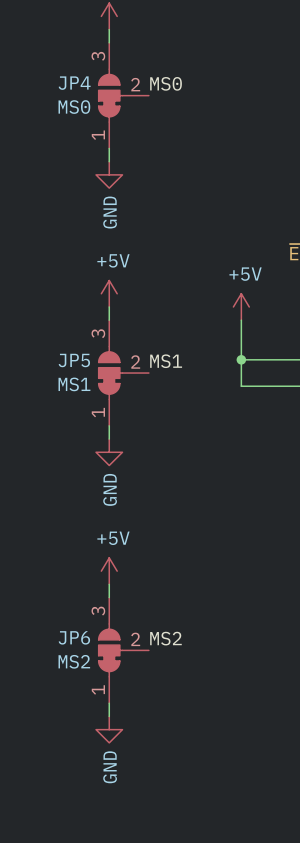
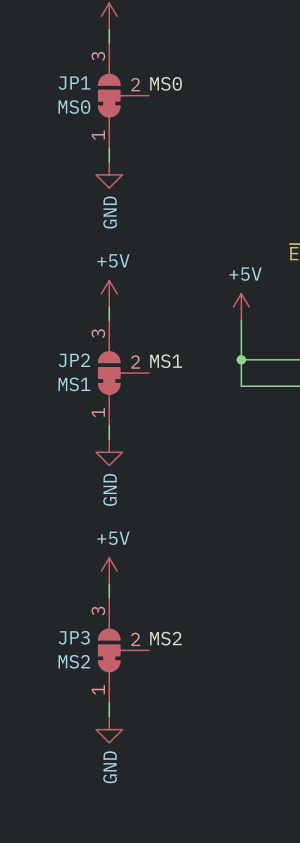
JP4 name: JP4 (74, 83) -> JP1 (74, 83)
JP5 name: JP5 (74, 360) -> JP2 (74, 360)
JP6 name: JP6 (74, 637) -> JP3 (74, 637)

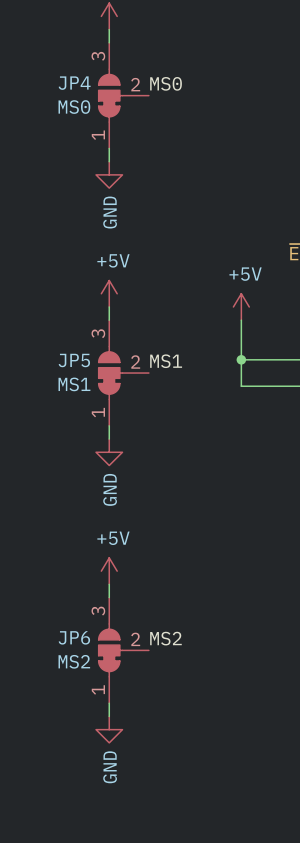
JP1 name: JP1 (74, 83) -> JP4 (74, 83)
JP2 name: JP2 (74, 360) -> JP5 (74, 360)
JP3 name: JP3 (74, 637) -> JP6 (74, 637)

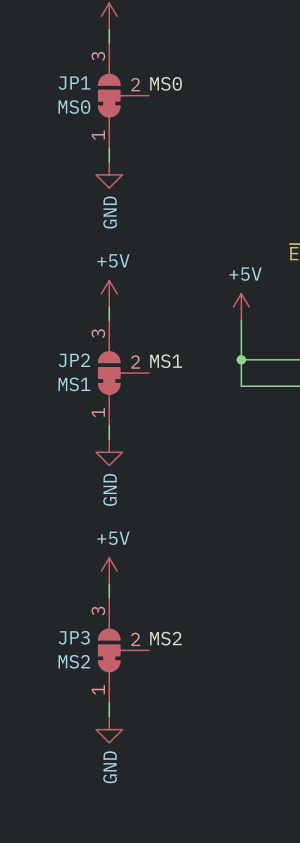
JP4 name: JP4 (74, 83) -> JP1 (74, 83)
JP5 name: JP5 (74, 360) -> JP2 (74, 360)
JP6 name: JP6 (74, 637) -> JP3 (74, 637)

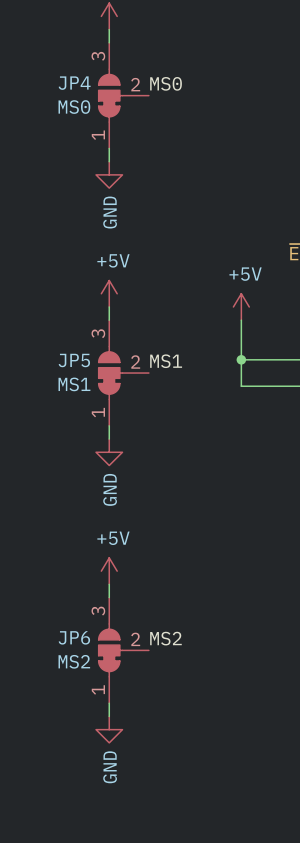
JP1 name: JP1 (74, 83) -> JP4 (74, 83)
JP2 name: JP2 (74, 360) -> JP5 (74, 360)
JP3 name: JP3 (74, 637) -> JP6 (74, 637)

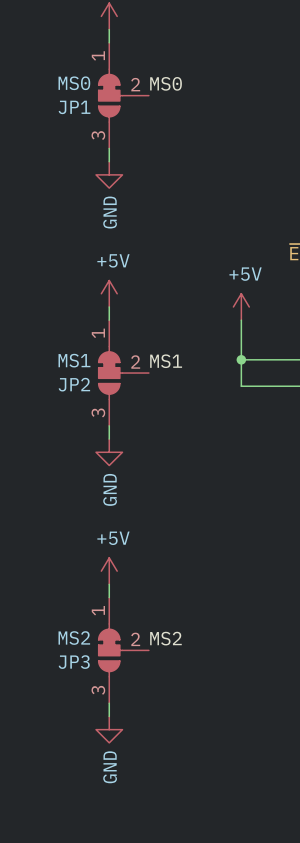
JP4: MS0 (123, 95) -> none
JP1: none -> MS0 (123, 95)
JP5: MS1 (123, 373) -> none
JP2: none -> MS1 (123, 373)
JP6: MS2 (123, 650) -> none
JP3: none -> MS2 (123, 650)

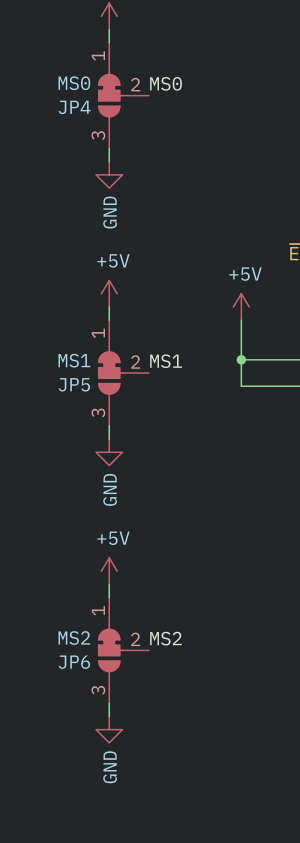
JP1 name: JP1 (74, 107) -> JP4 (74, 107)
JP2 name: JP2 (74, 384) -> JP5 (74, 384)
JP3 name: JP3 (74, 662) -> JP6 (74, 662)

